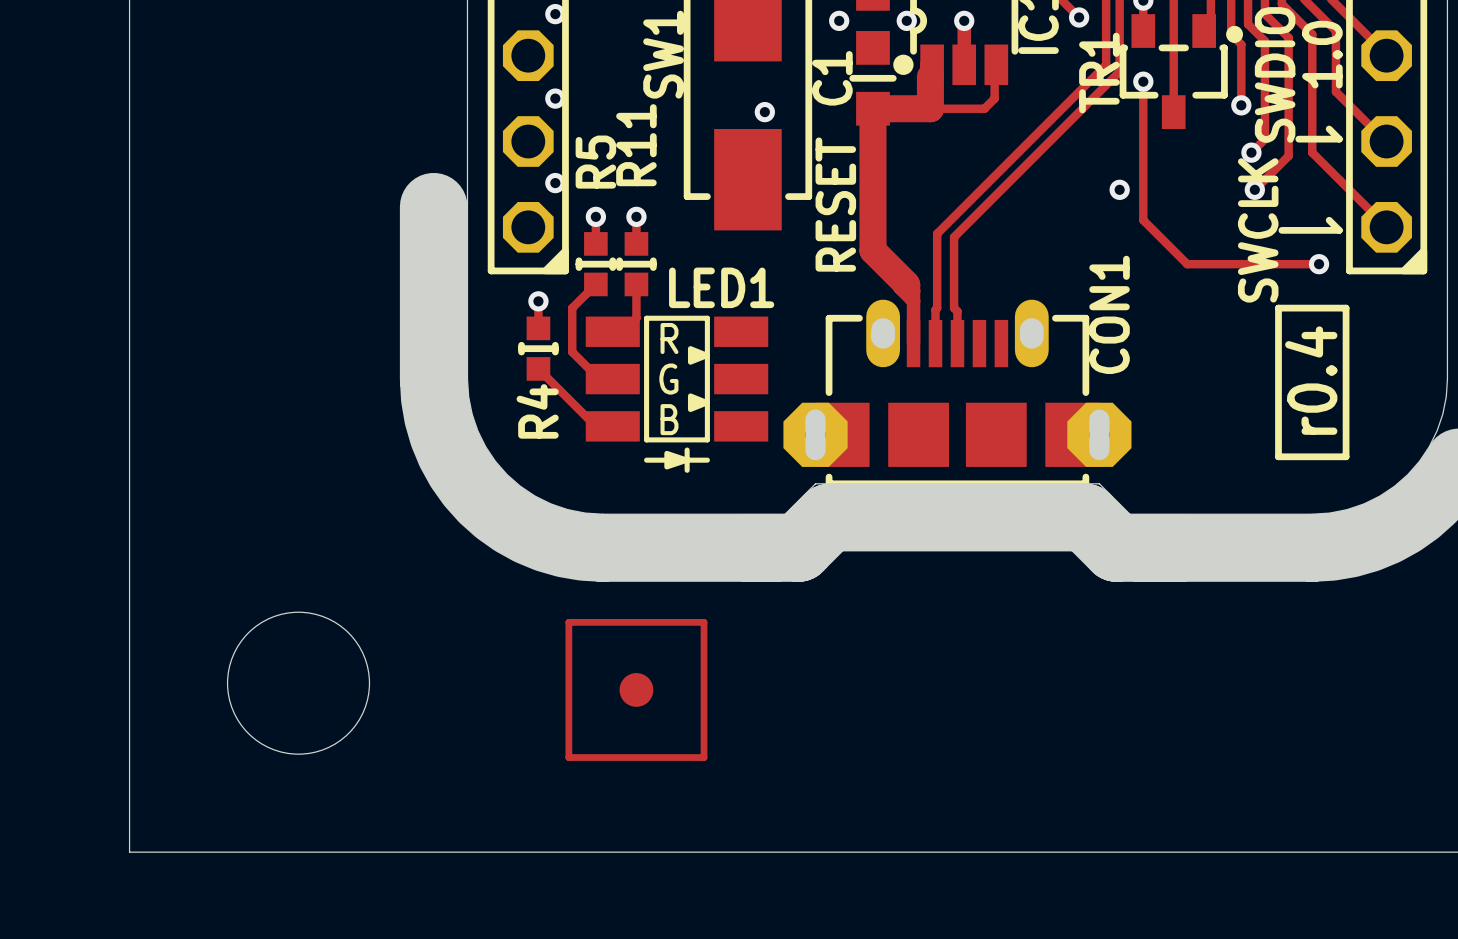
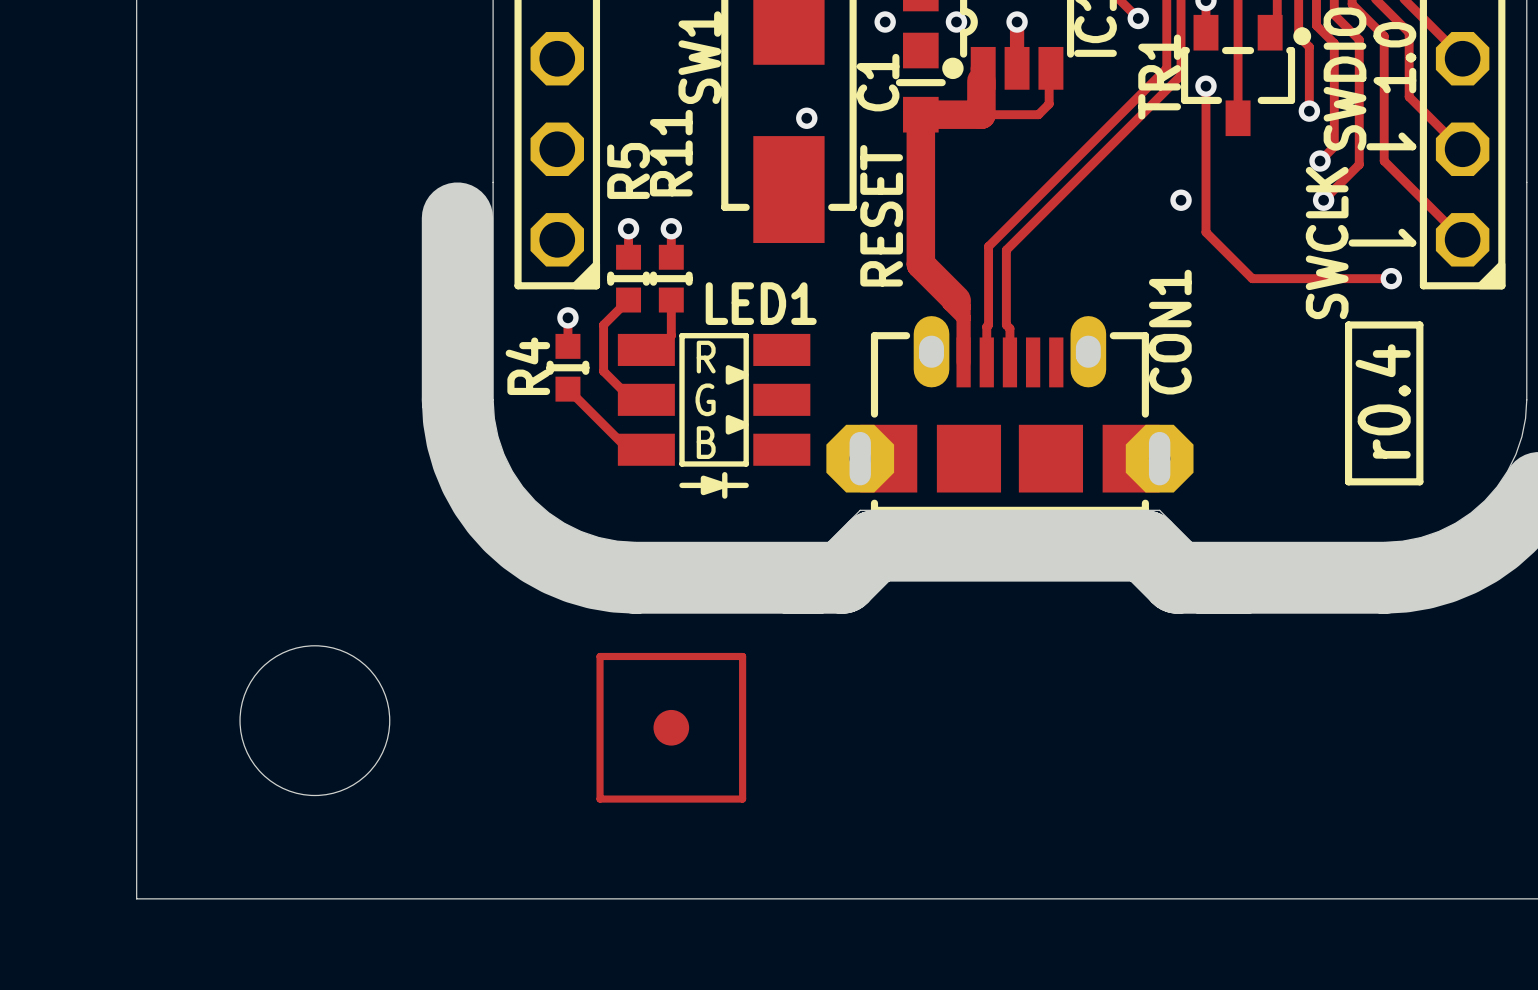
via: (555, 14) -> none
via: (555, 98) -> none
via: (555, 183) -> none
R4 name position: R4 (537, 411) -> R4 (527, 366)

